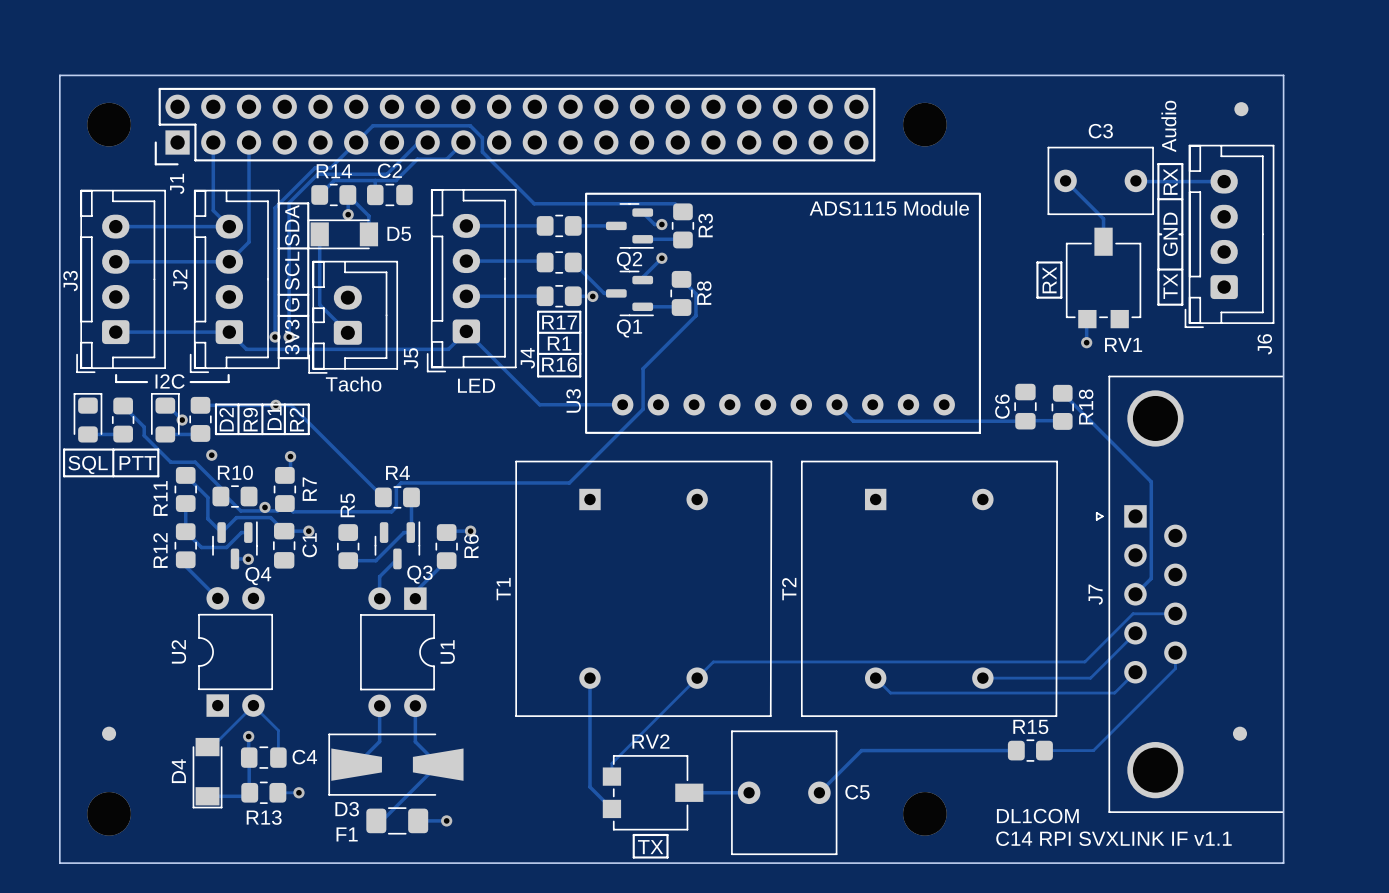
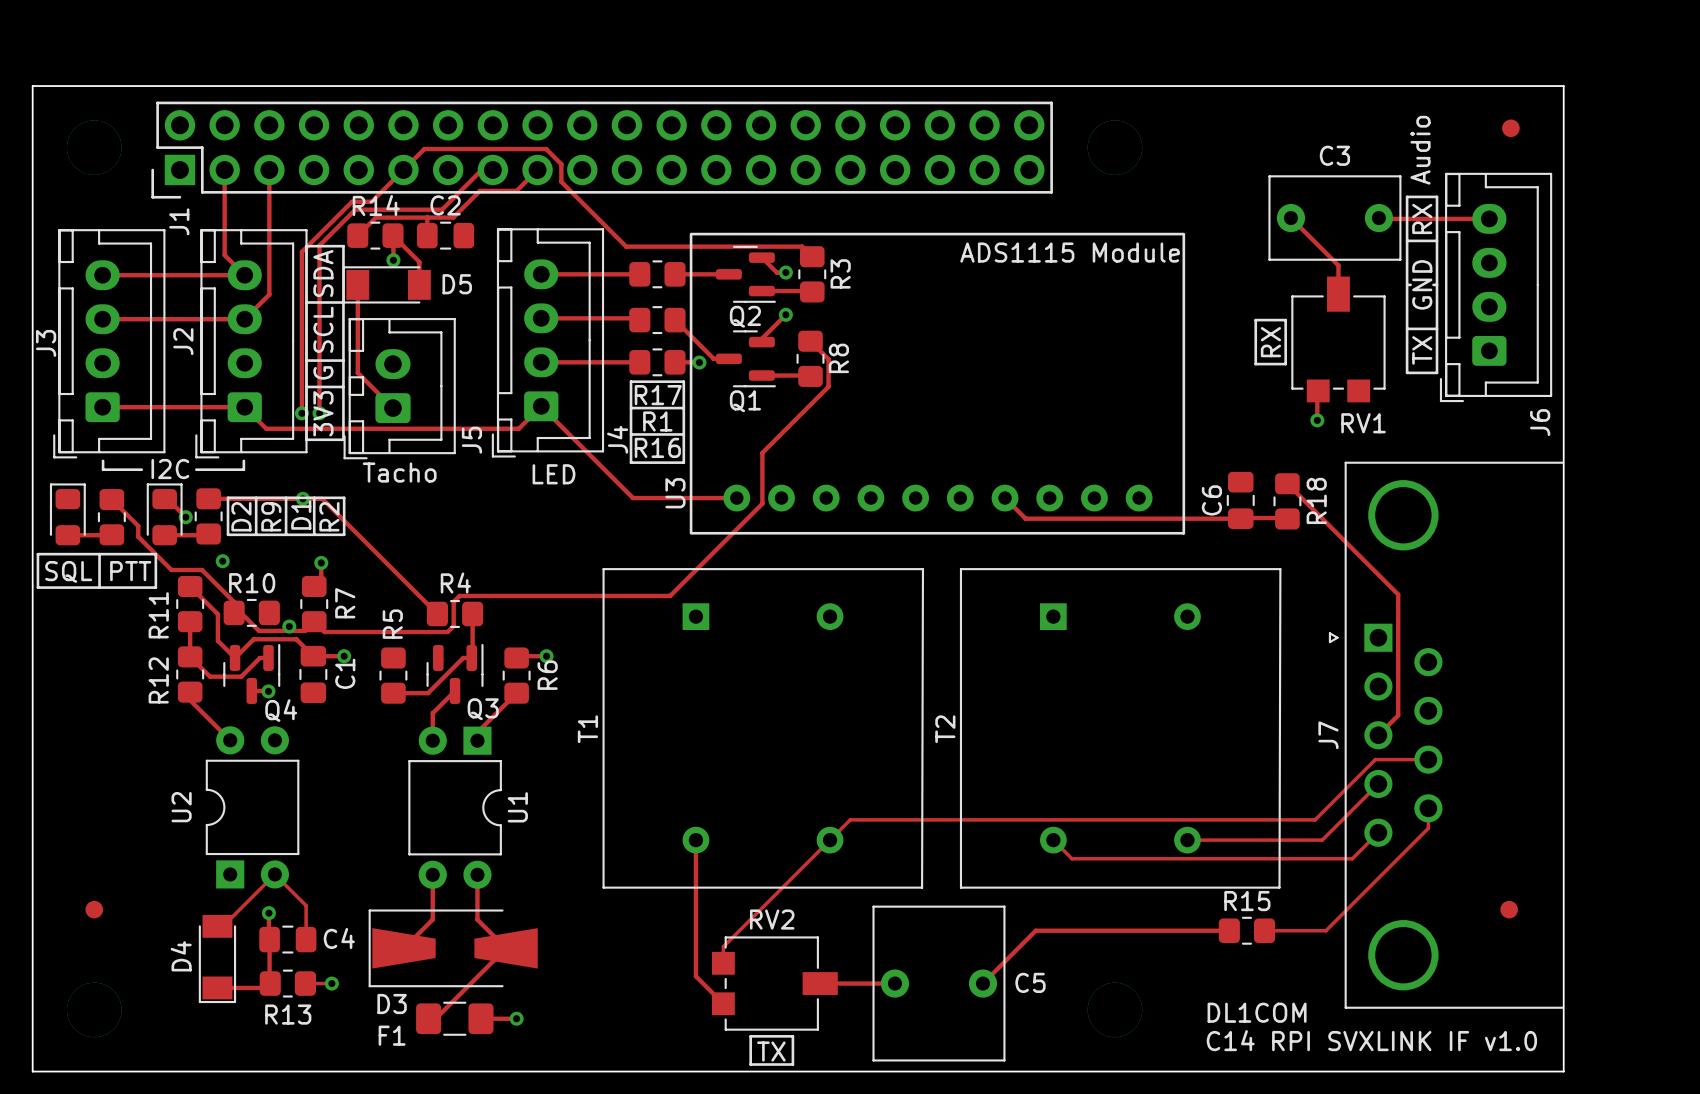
text: C14 RPI SVXLINK IF v1.1 (1114, 838) -> C14 RPI SVXLINK IF v1.0 (1371, 1040)

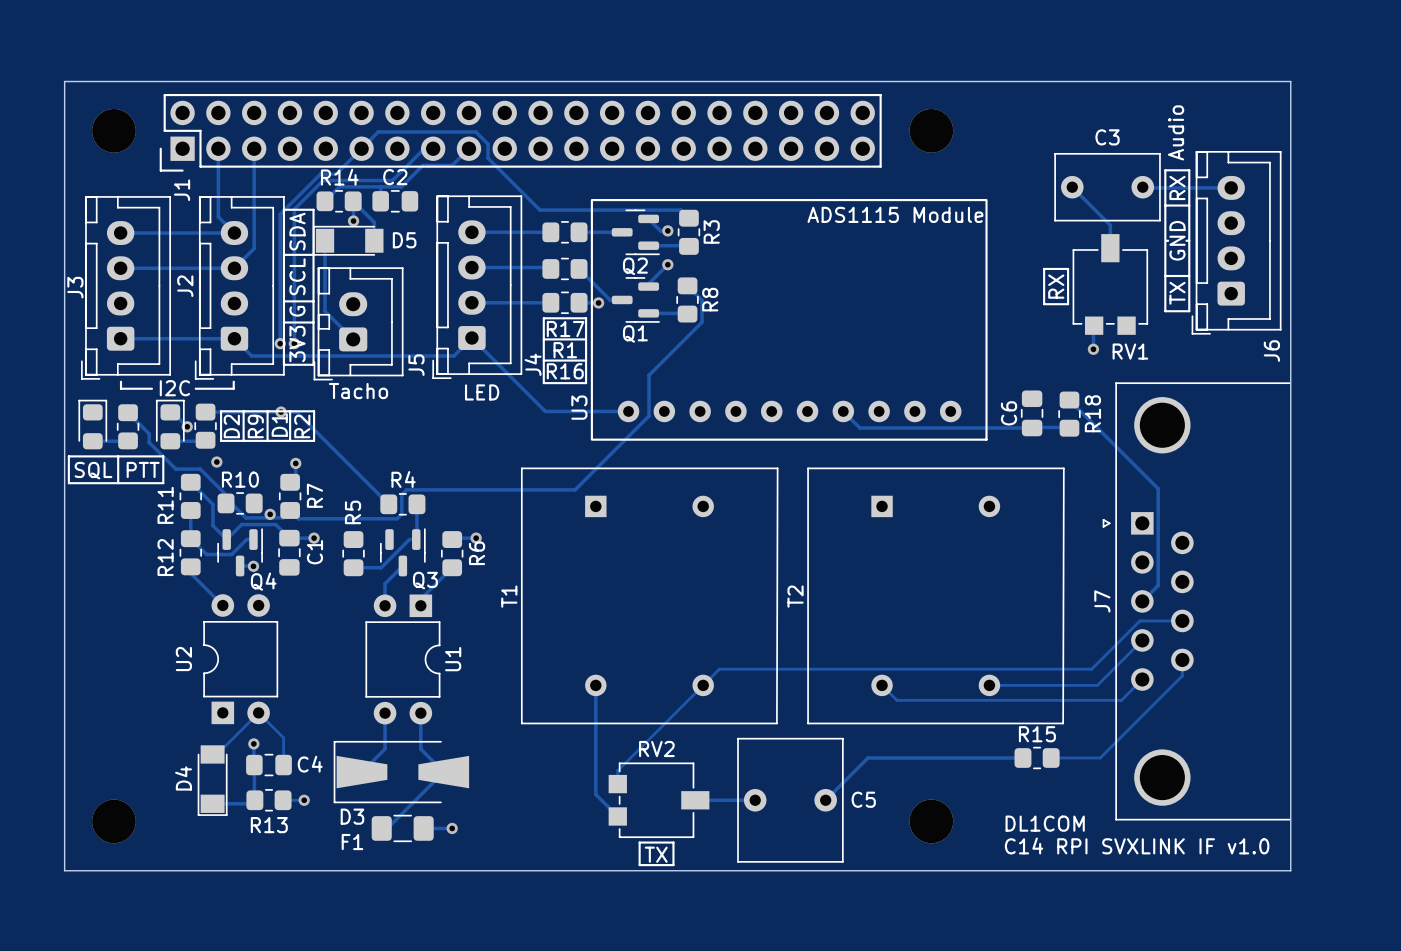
part: (1510, 128) -> none
part: (94, 909) -> none
part: (1509, 909) -> none

